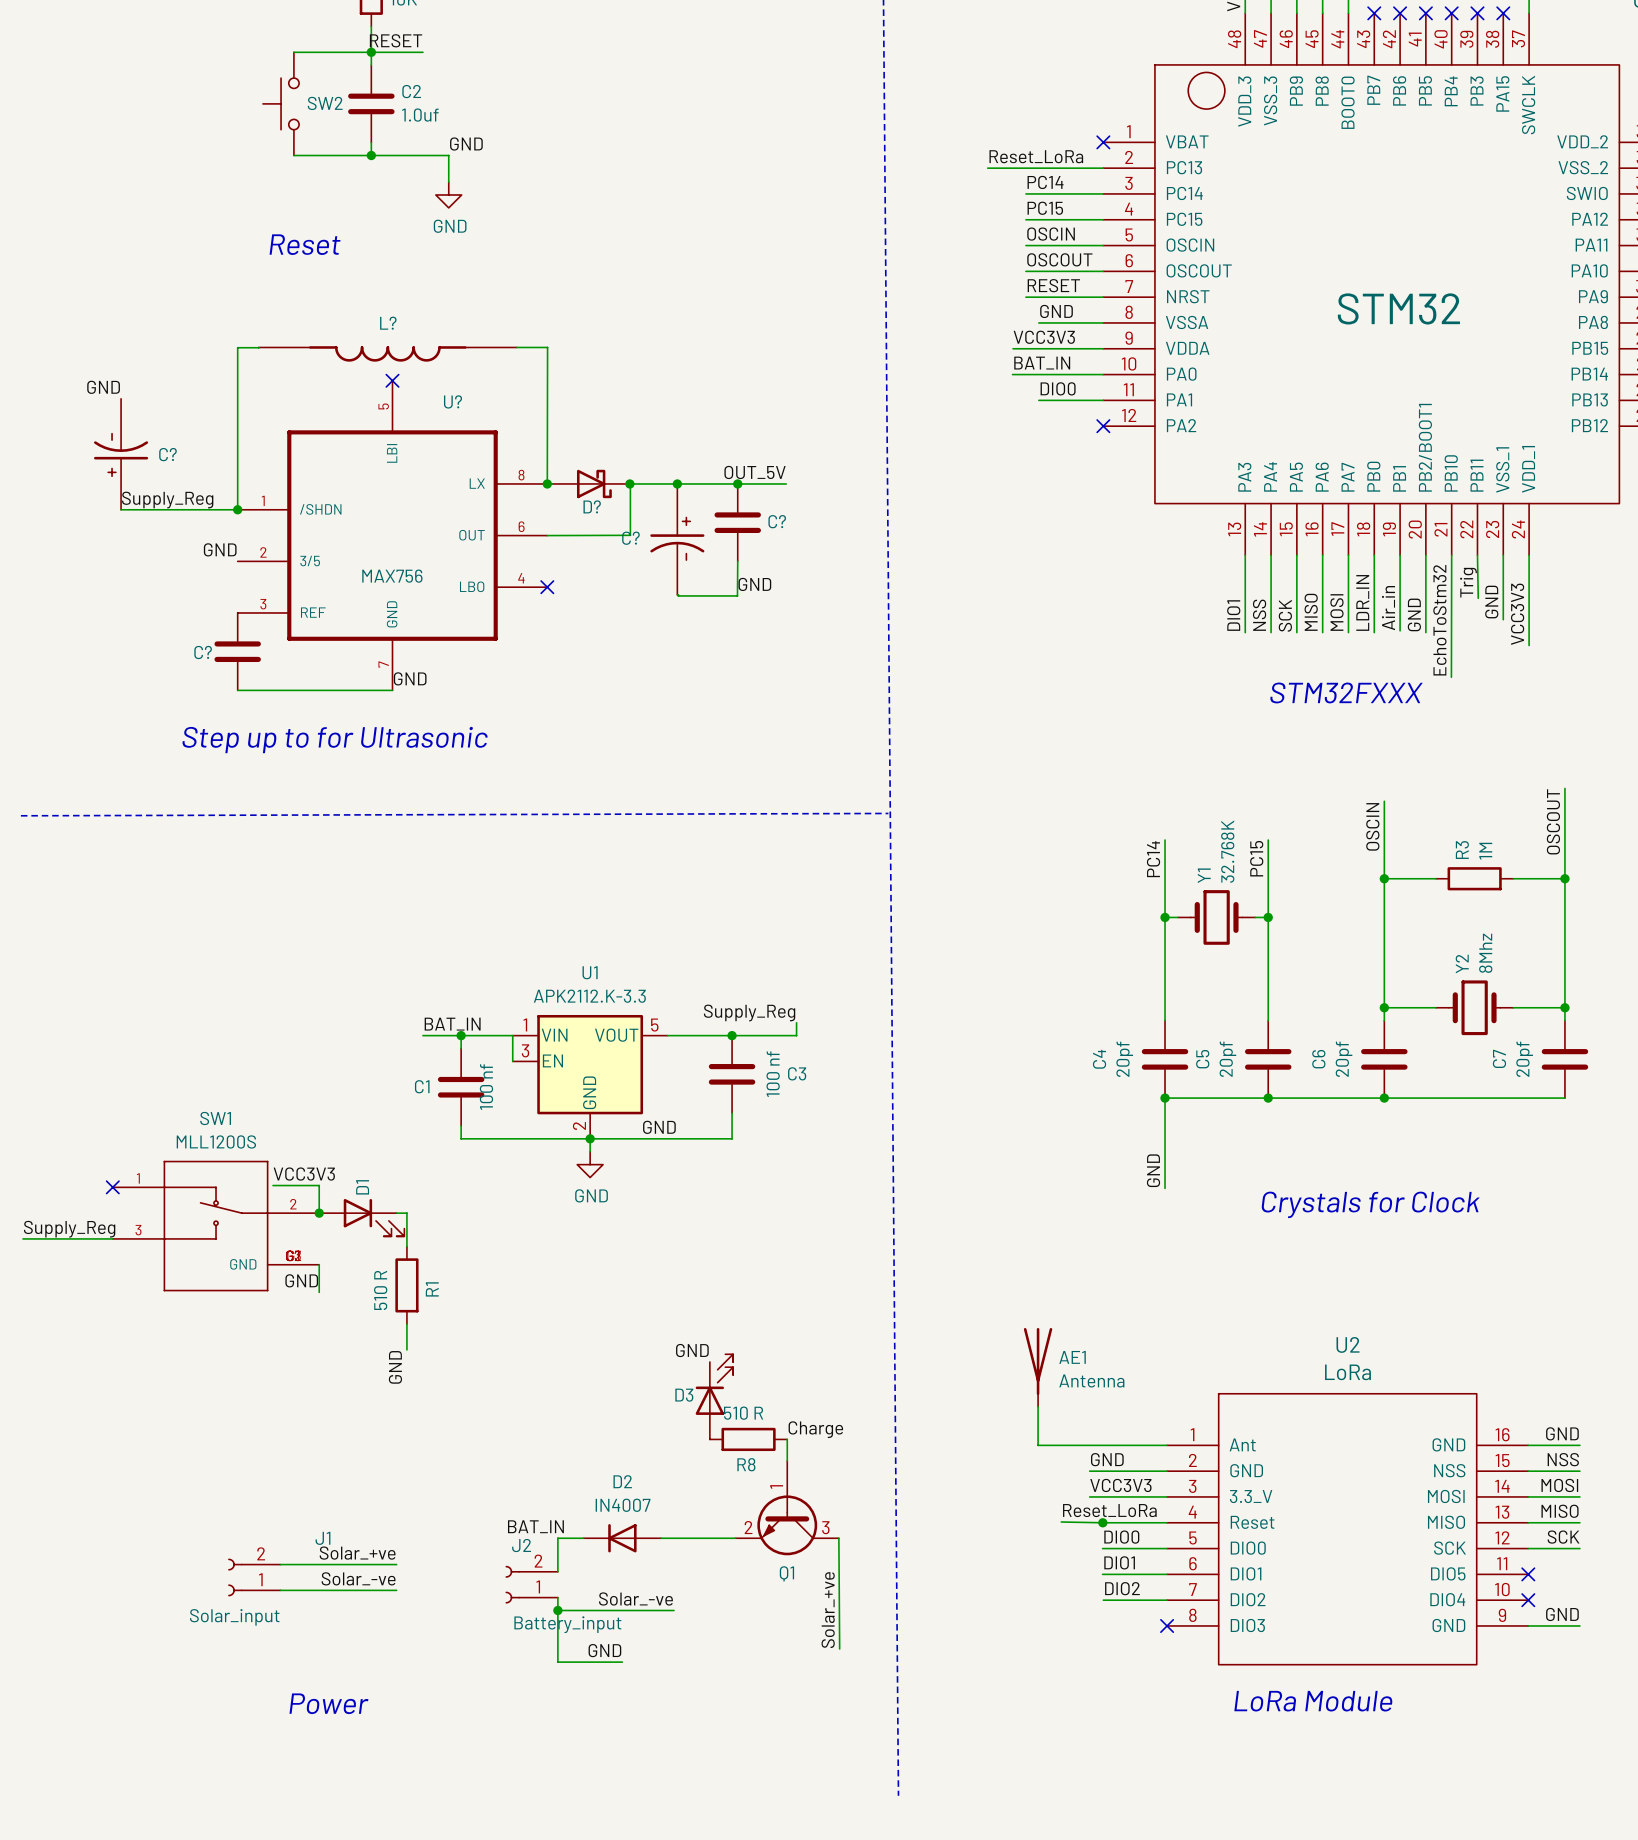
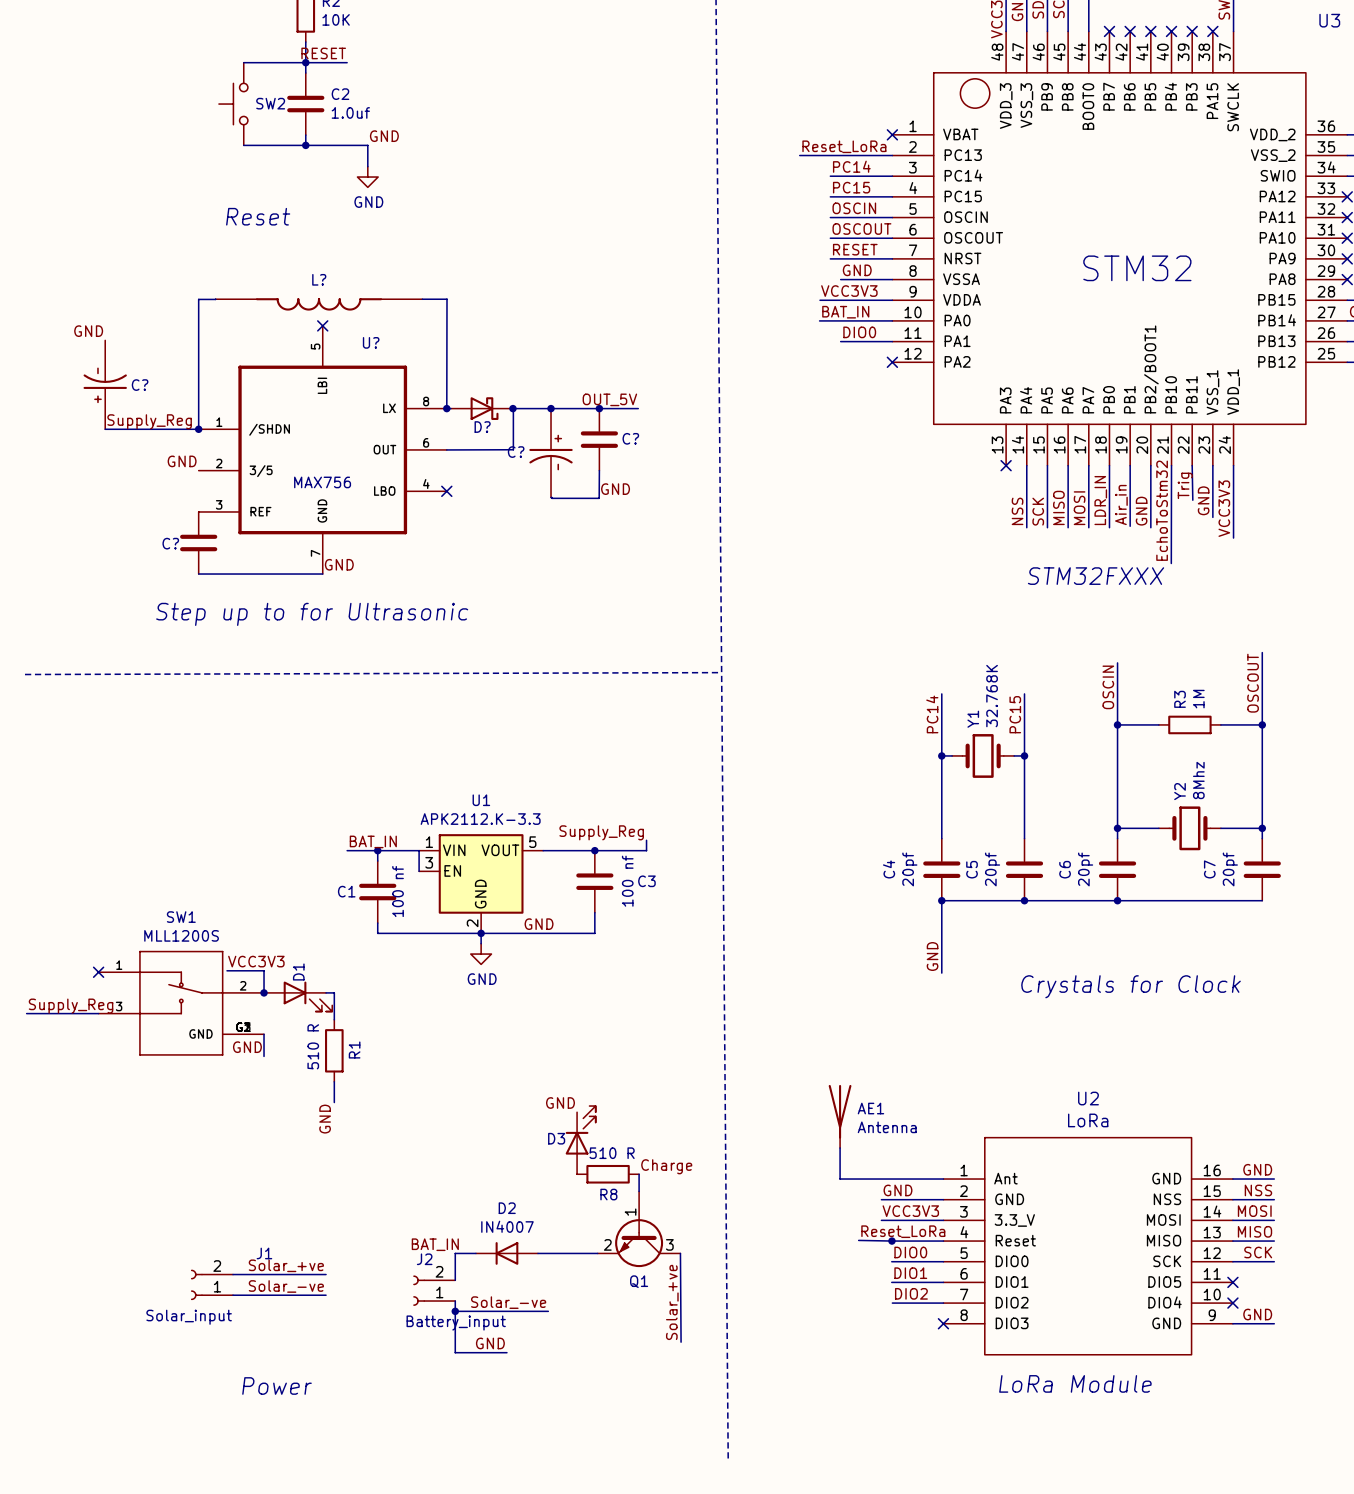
wire: (1245, 555) (1245, 632) -> none
no-connect mark: none -> (1006, 465)
label: DIO1 (1233, 615) -> none

